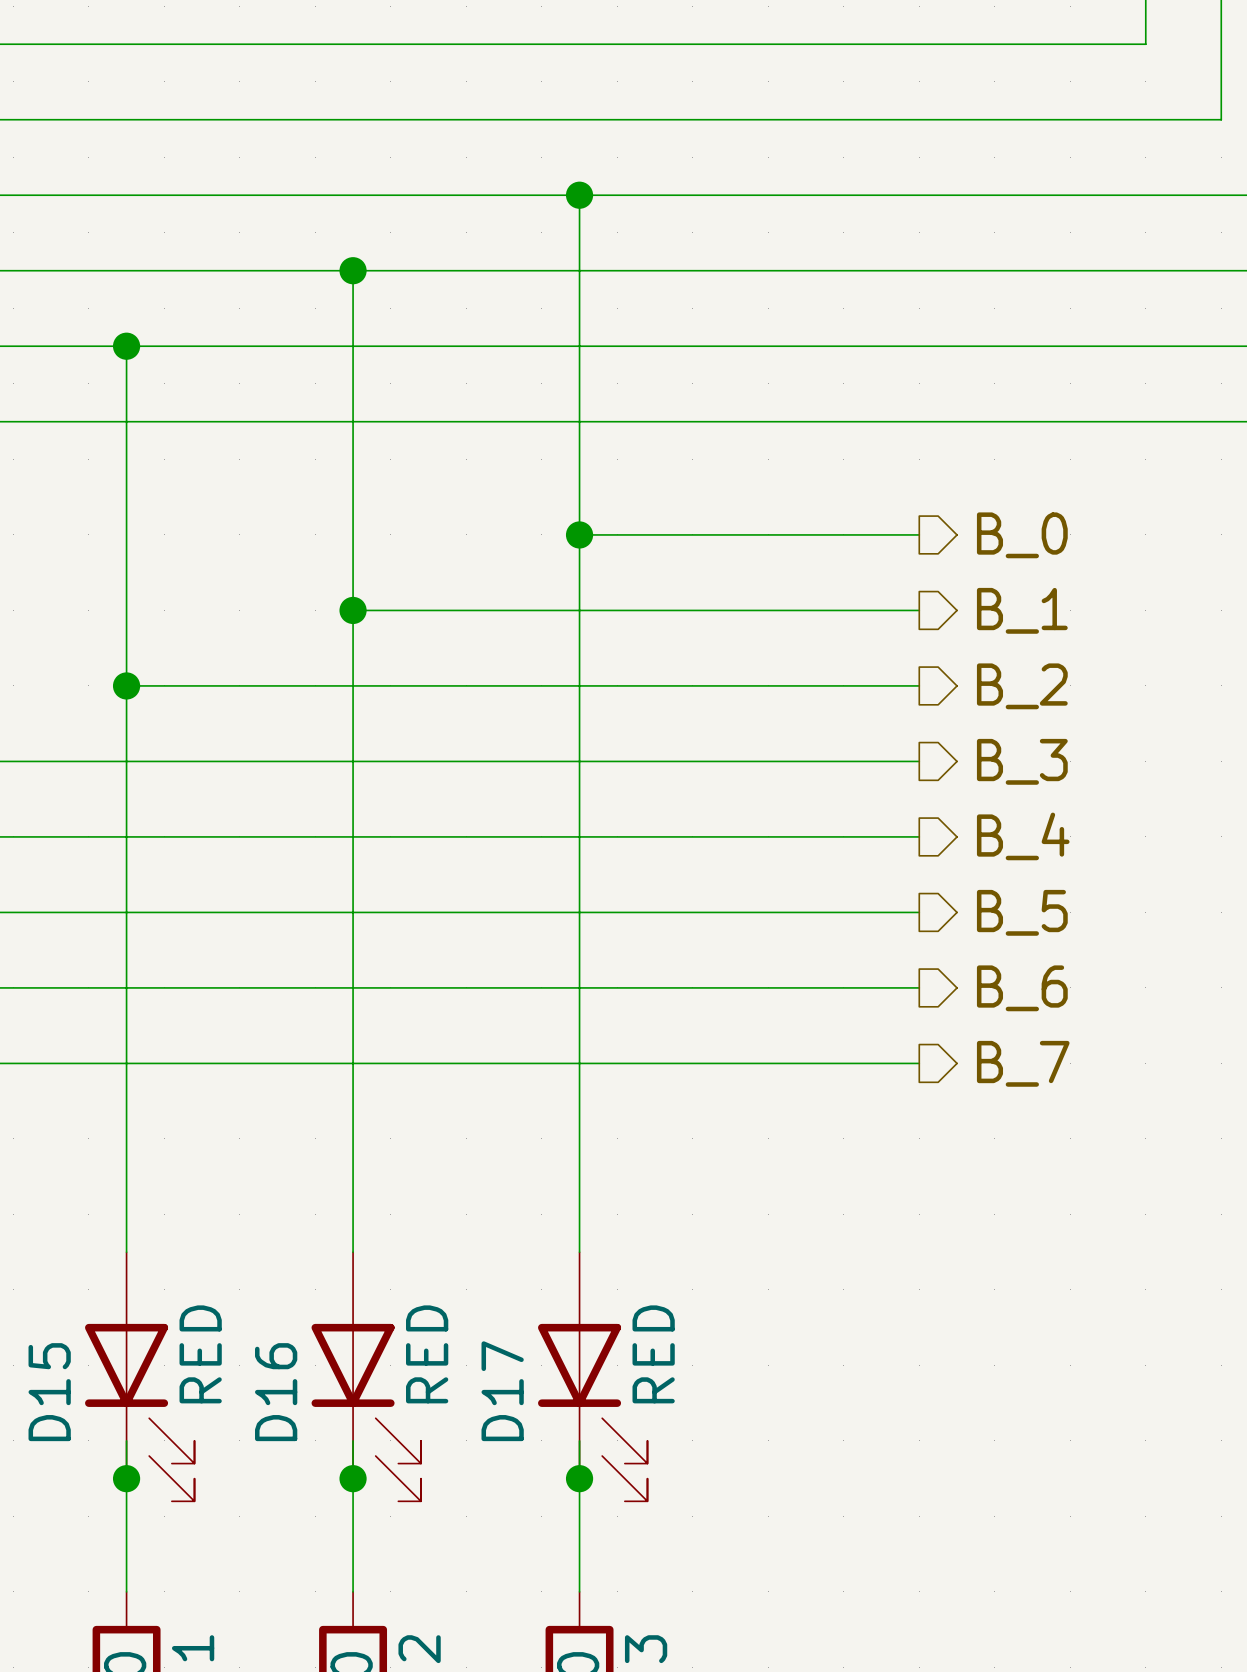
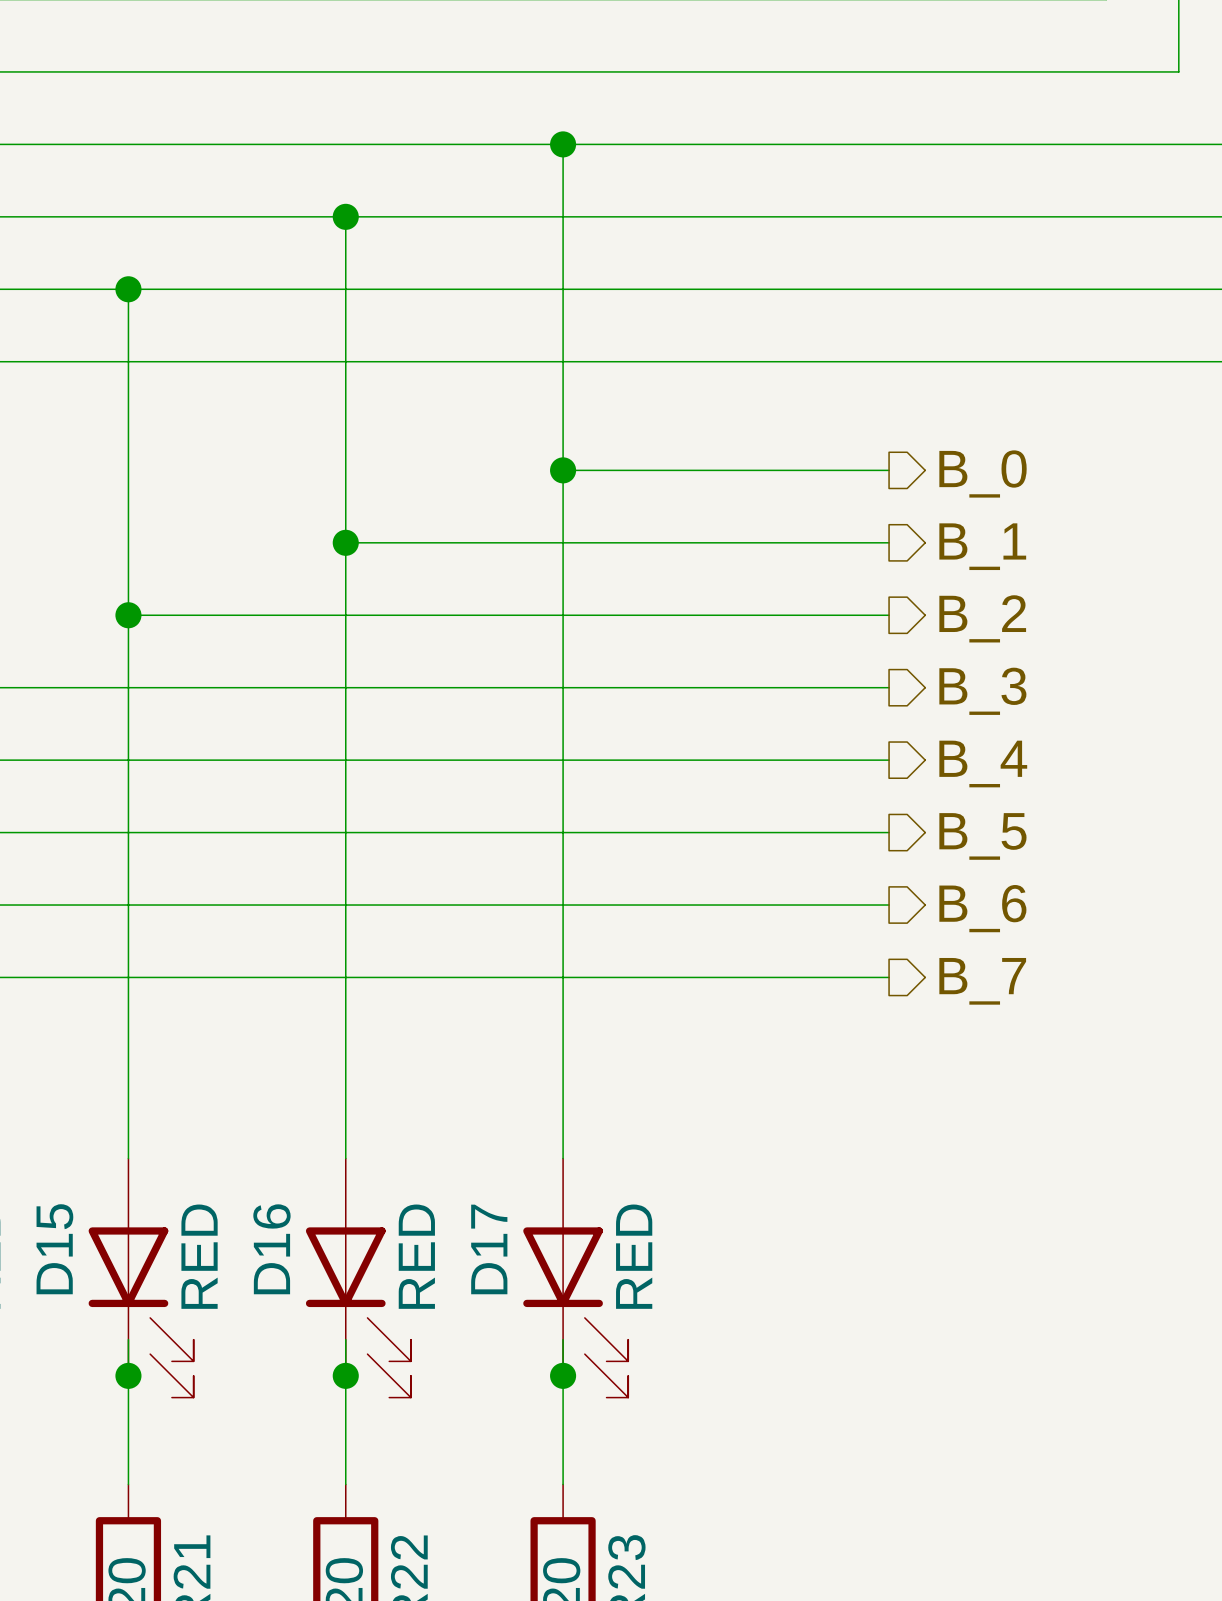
D17 name position: D17 (502, 1391) -> D17 (489, 1249)
D15 name position: D15 (49, 1392) -> D15 (54, 1249)
D16 name position: D16 (276, 1392) -> D16 (271, 1249)

